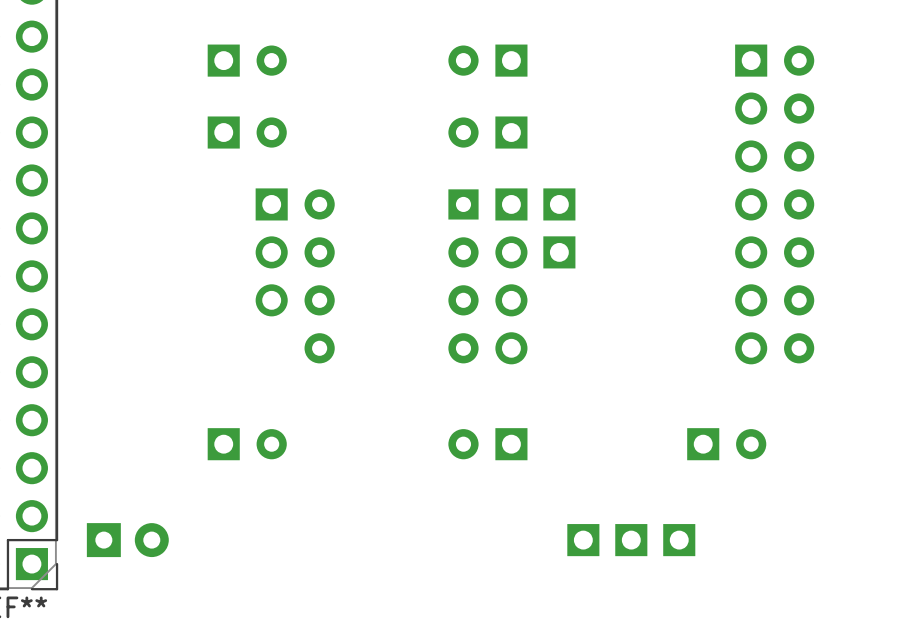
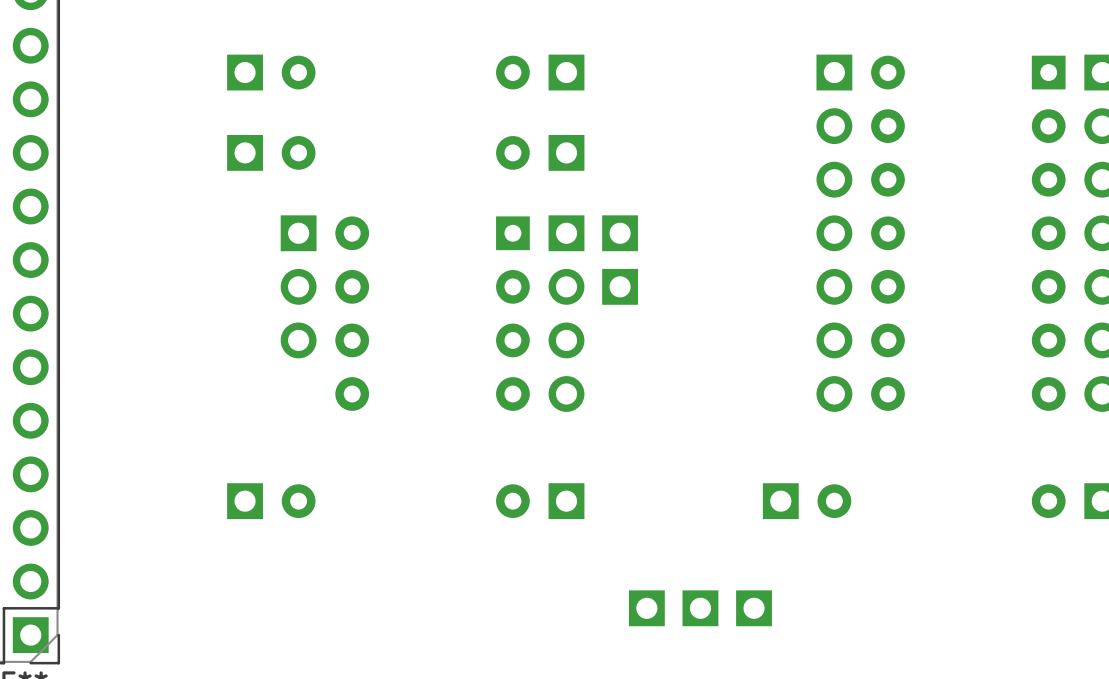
part: (127, 540) -> none

